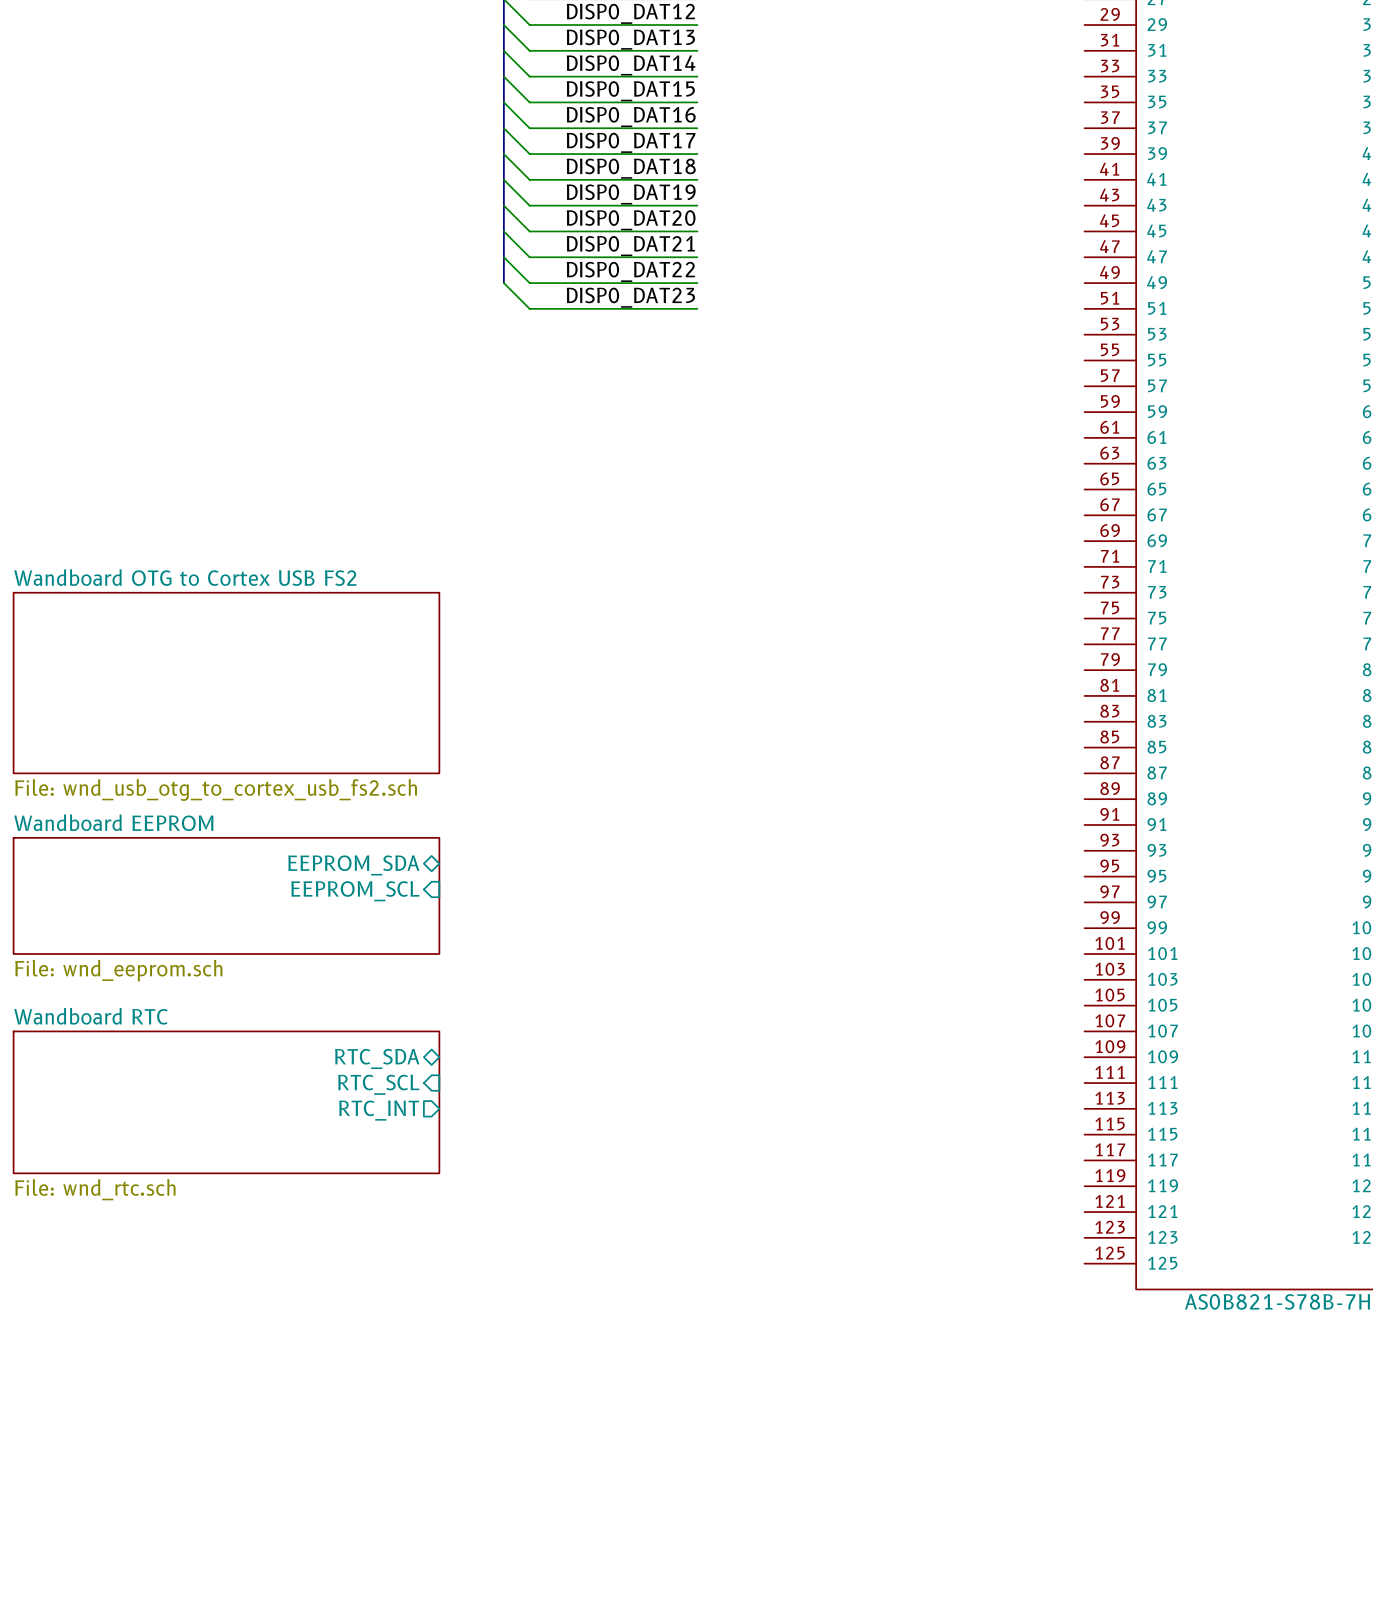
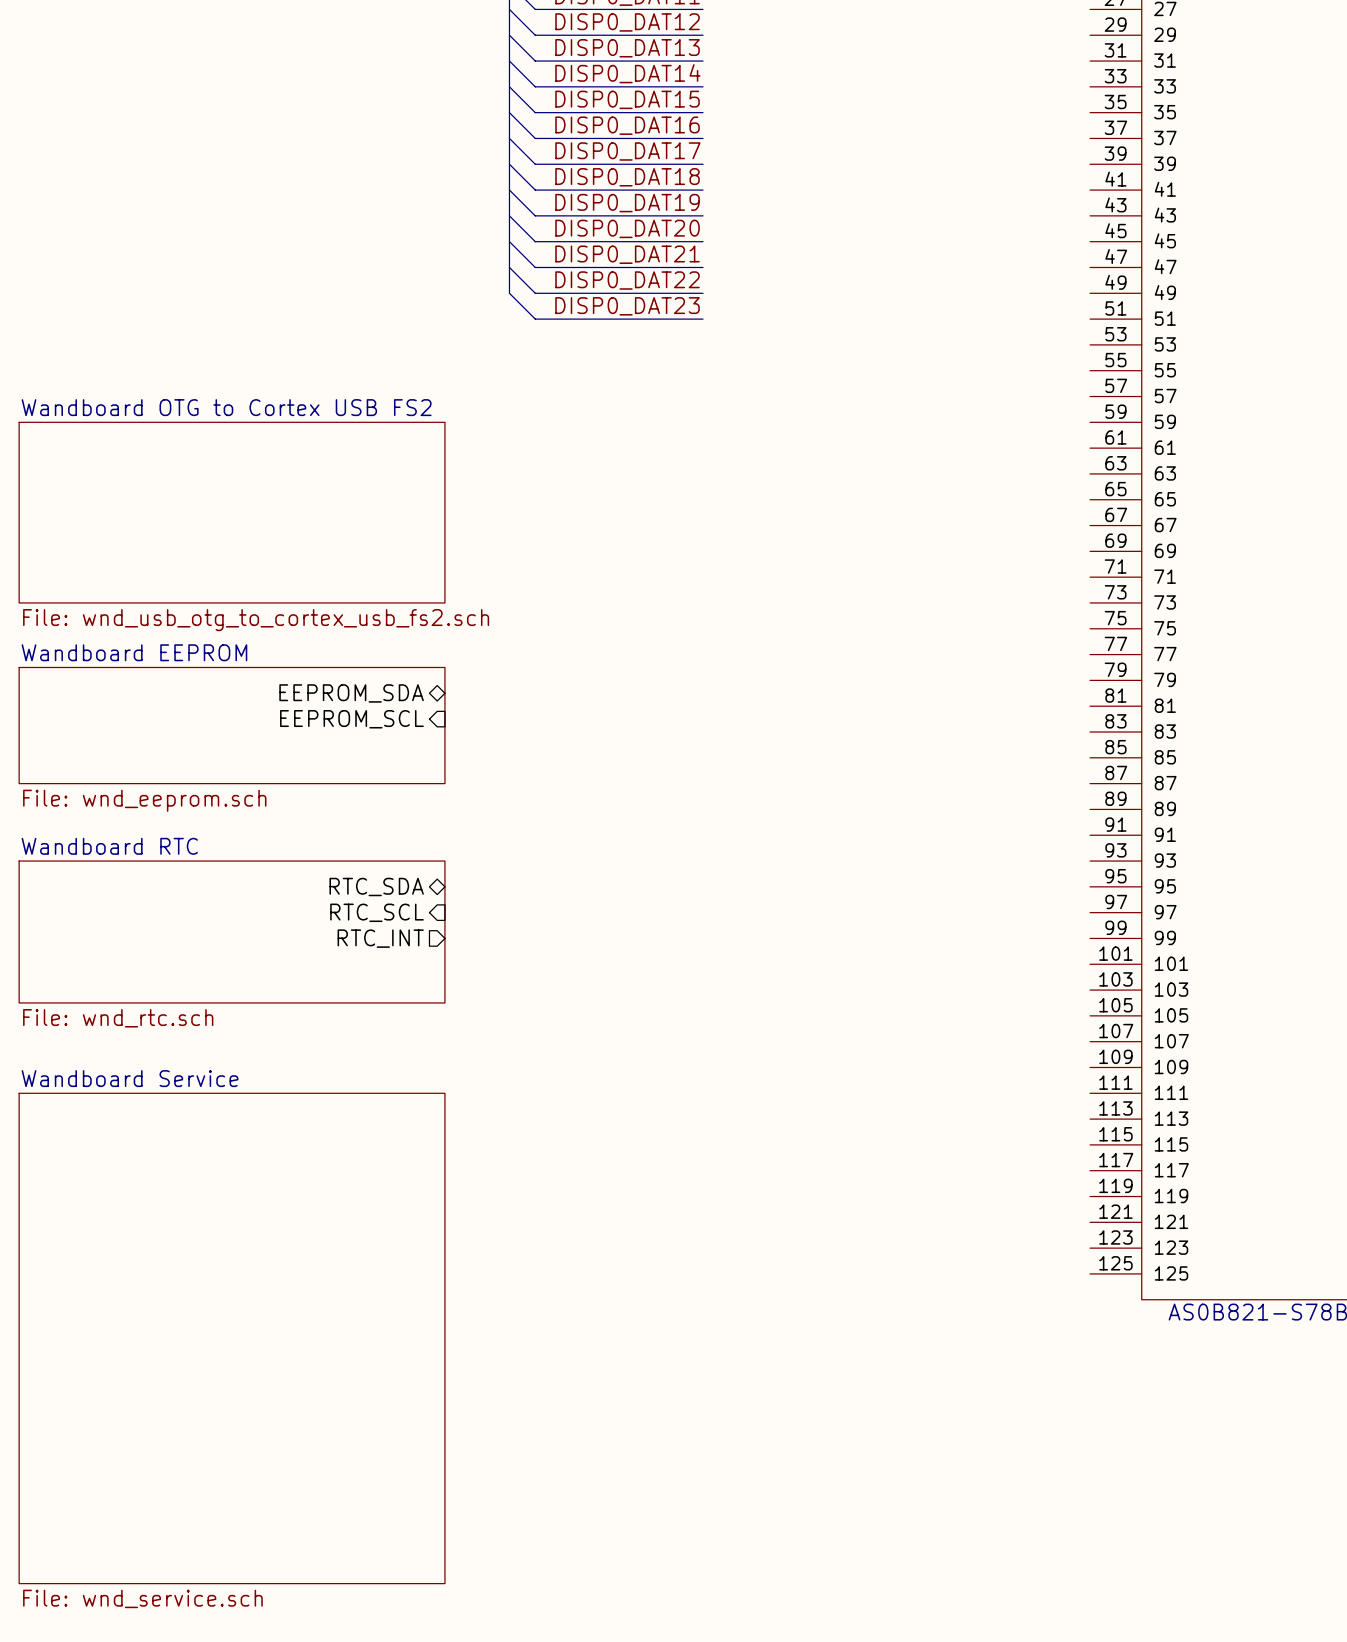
sheet Wandboard OTG to Cortex USB FS2 position: (226, 683) -> (232, 512)
sheet pin position: EEPROM_SDA (353, 865) -> EEPROM_SDA (351, 693)
sheet pin position: EEPROM_SCL (355, 891) -> EEPROM_SCL (351, 719)
sheet Wandboard EEPROM position: (226, 895) -> (232, 725)
sheet pin position: RTC_SDA (377, 1058) -> RTC_SDA (376, 887)
sheet pin position: RTC_SCL (378, 1084) -> RTC_SCL (377, 912)
sheet Wandboard RTC position: (226, 1102) -> (232, 932)
sheet pin position: RTC_INT (379, 1110) -> RTC_INT (380, 938)
sheet Wandboard Service: none -> File: wnd_service.sch (232, 1338)

